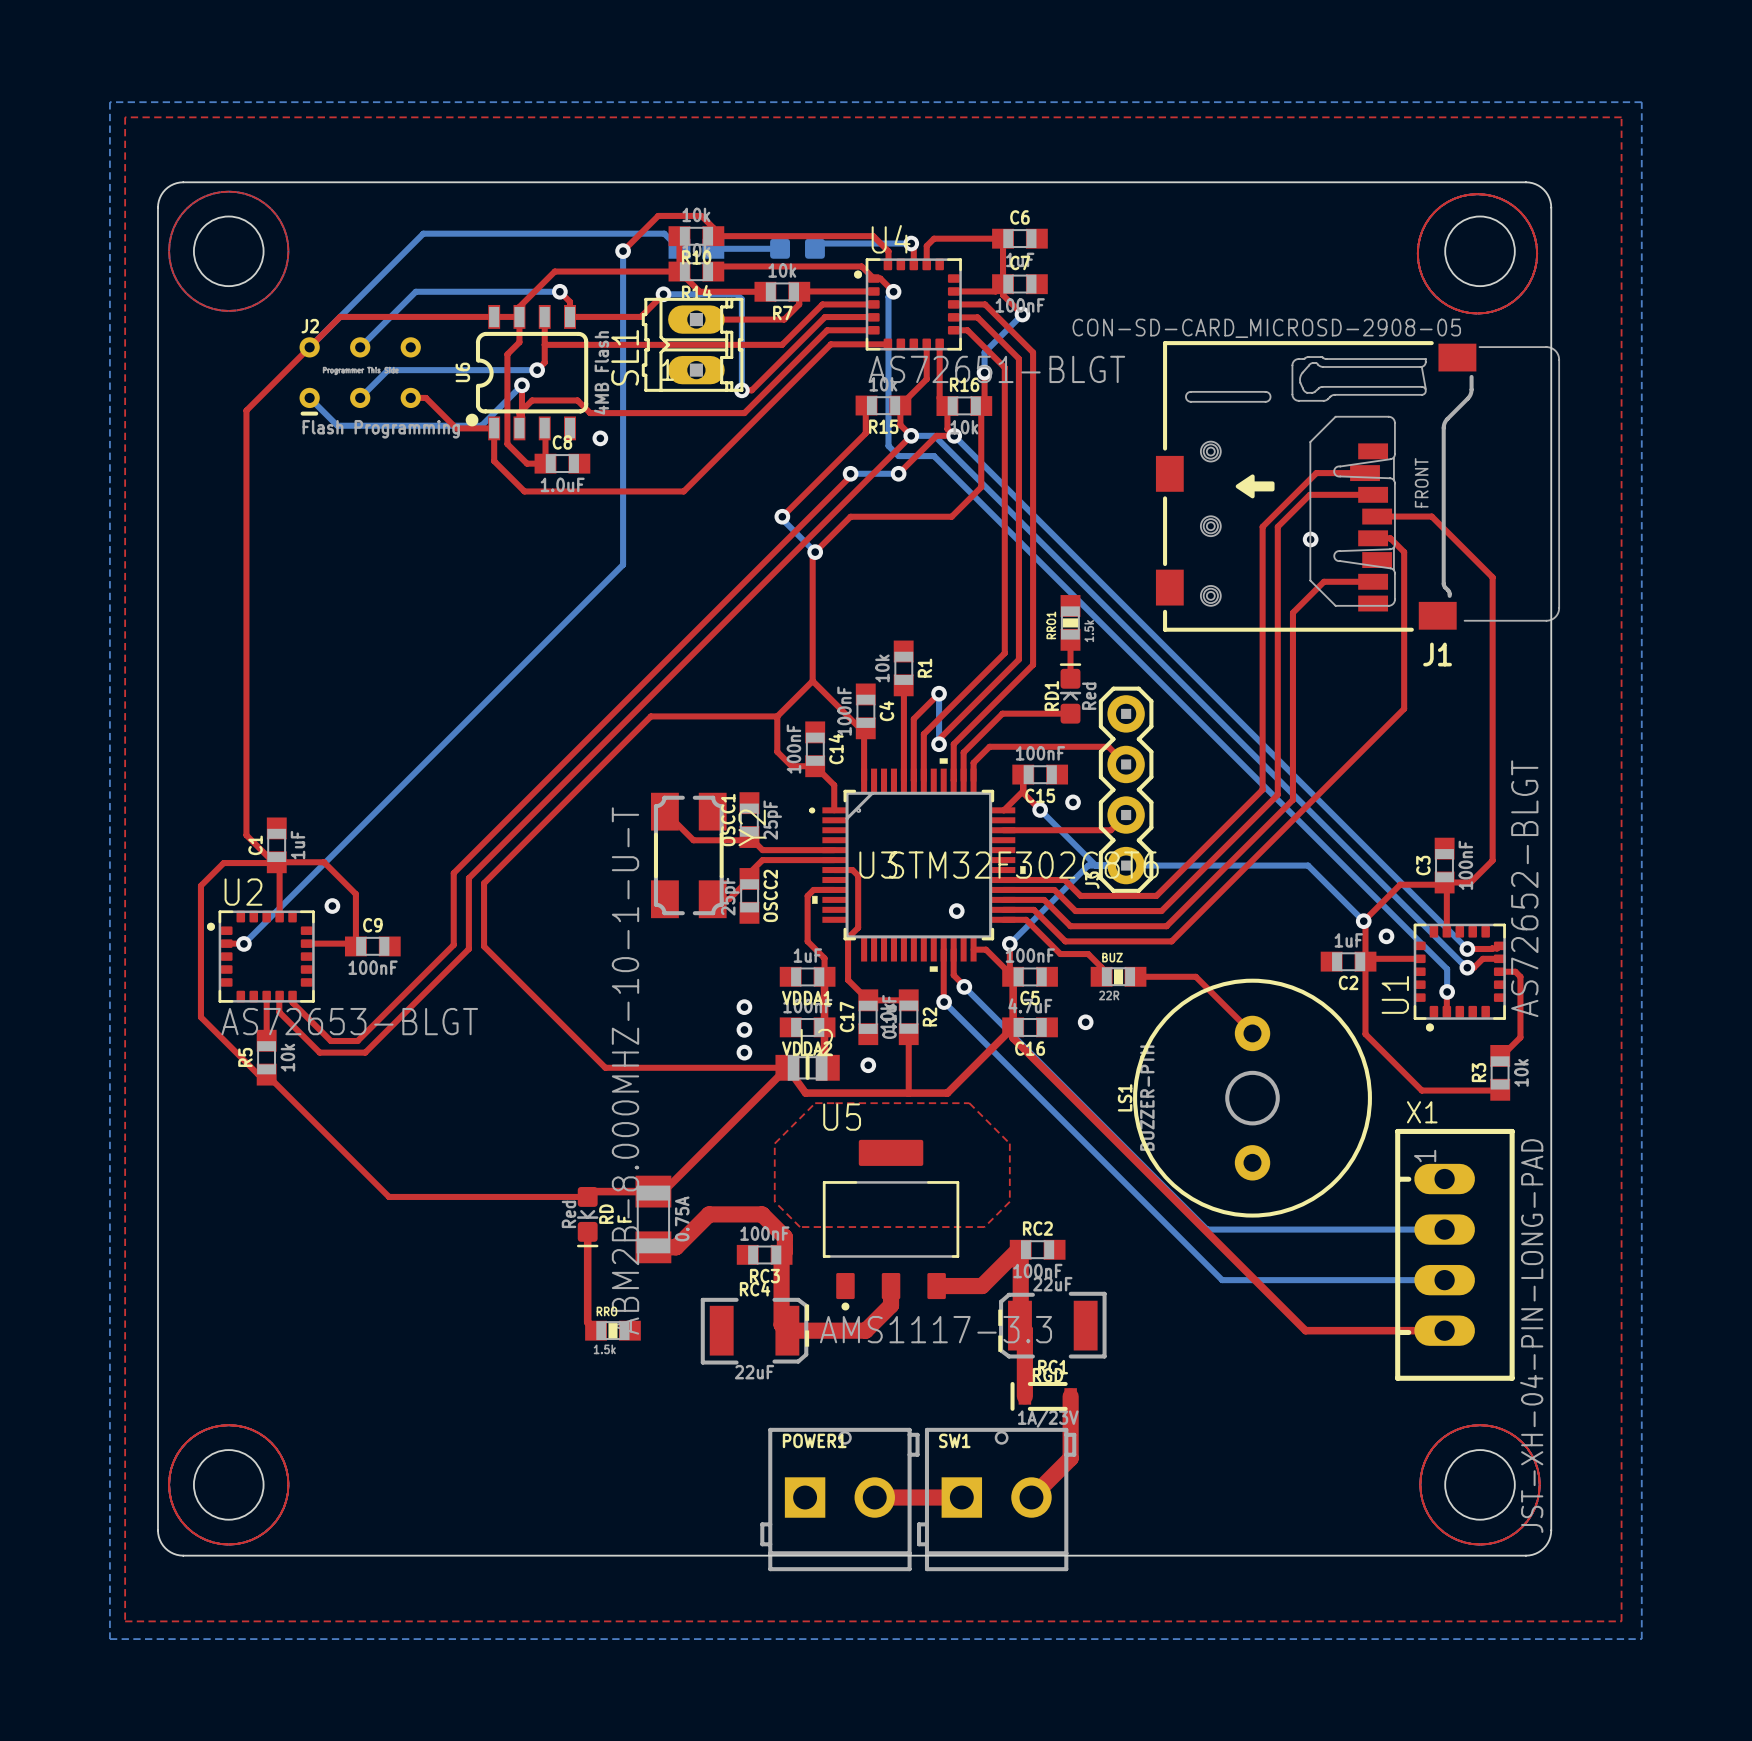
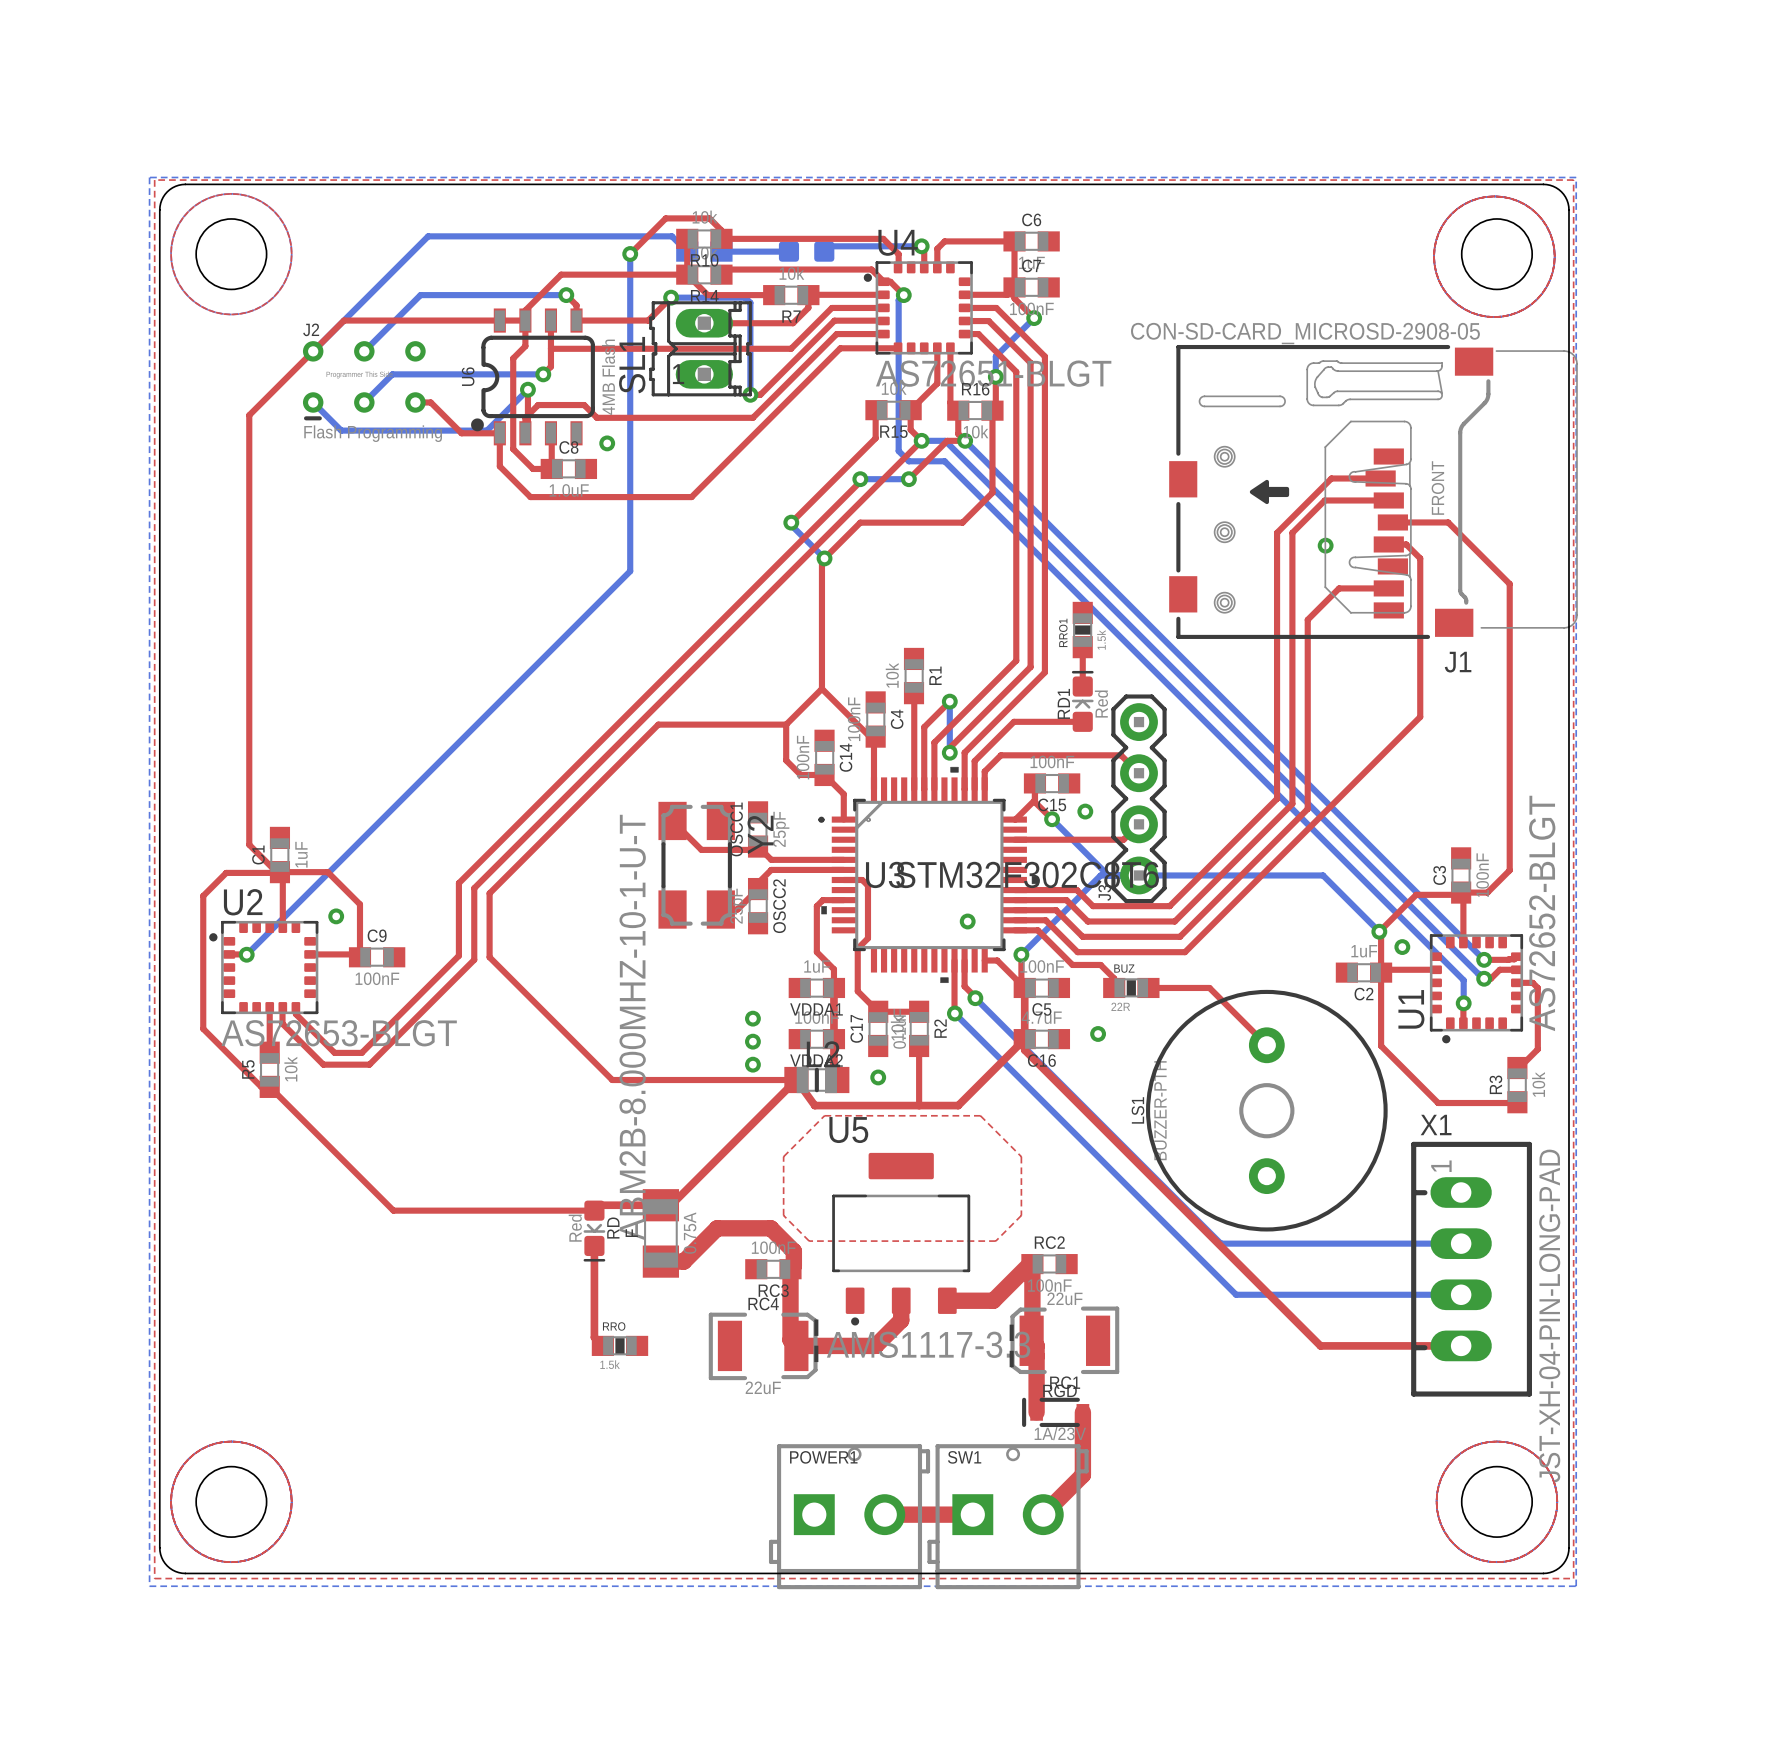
bottom zone outline: (109, 102) (109, 1639) (1641, 1639) (1641, 102) (109, 102) -> (149, 177) (149, 1586) (1576, 1586) (1576, 177) (149, 177)
top zone outline: (125, 117) (125, 1621) (1621, 1621) (1621, 117) (125, 117) -> (154, 180) (154, 1578) (1573, 1578) (1573, 180) (154, 180)

